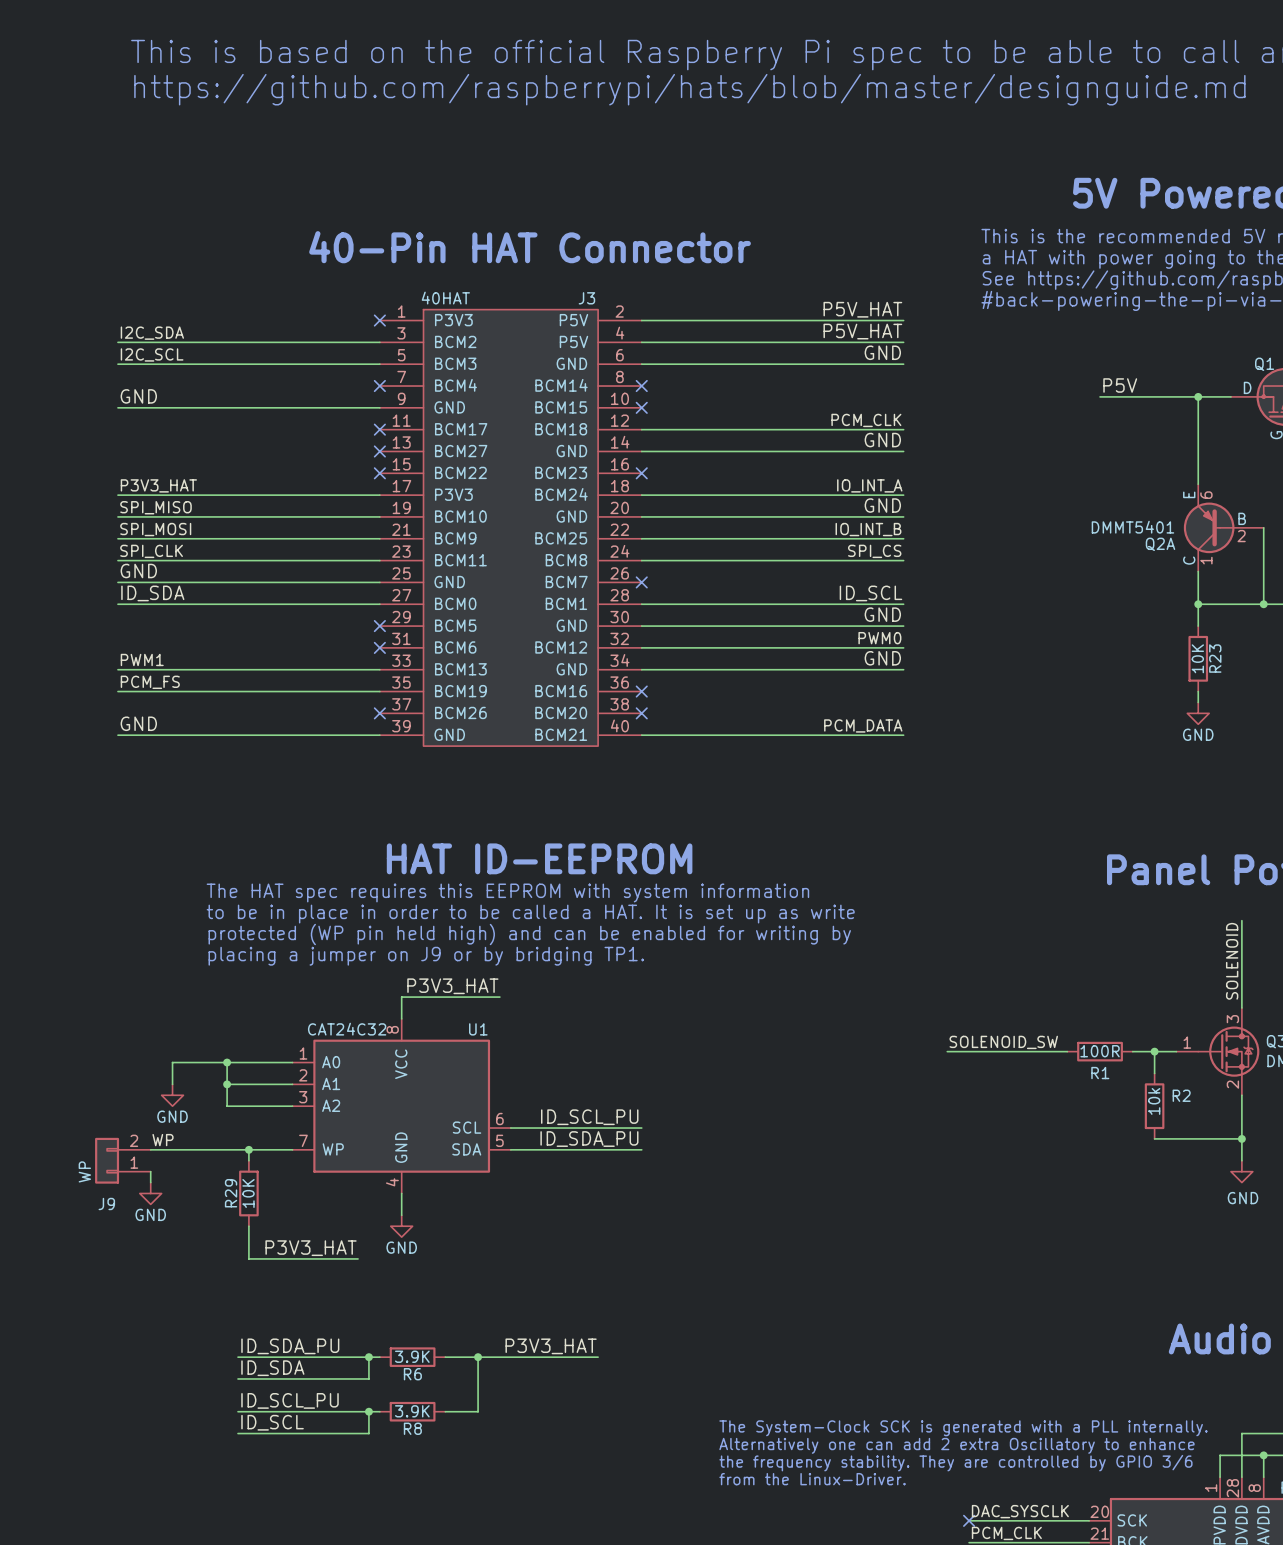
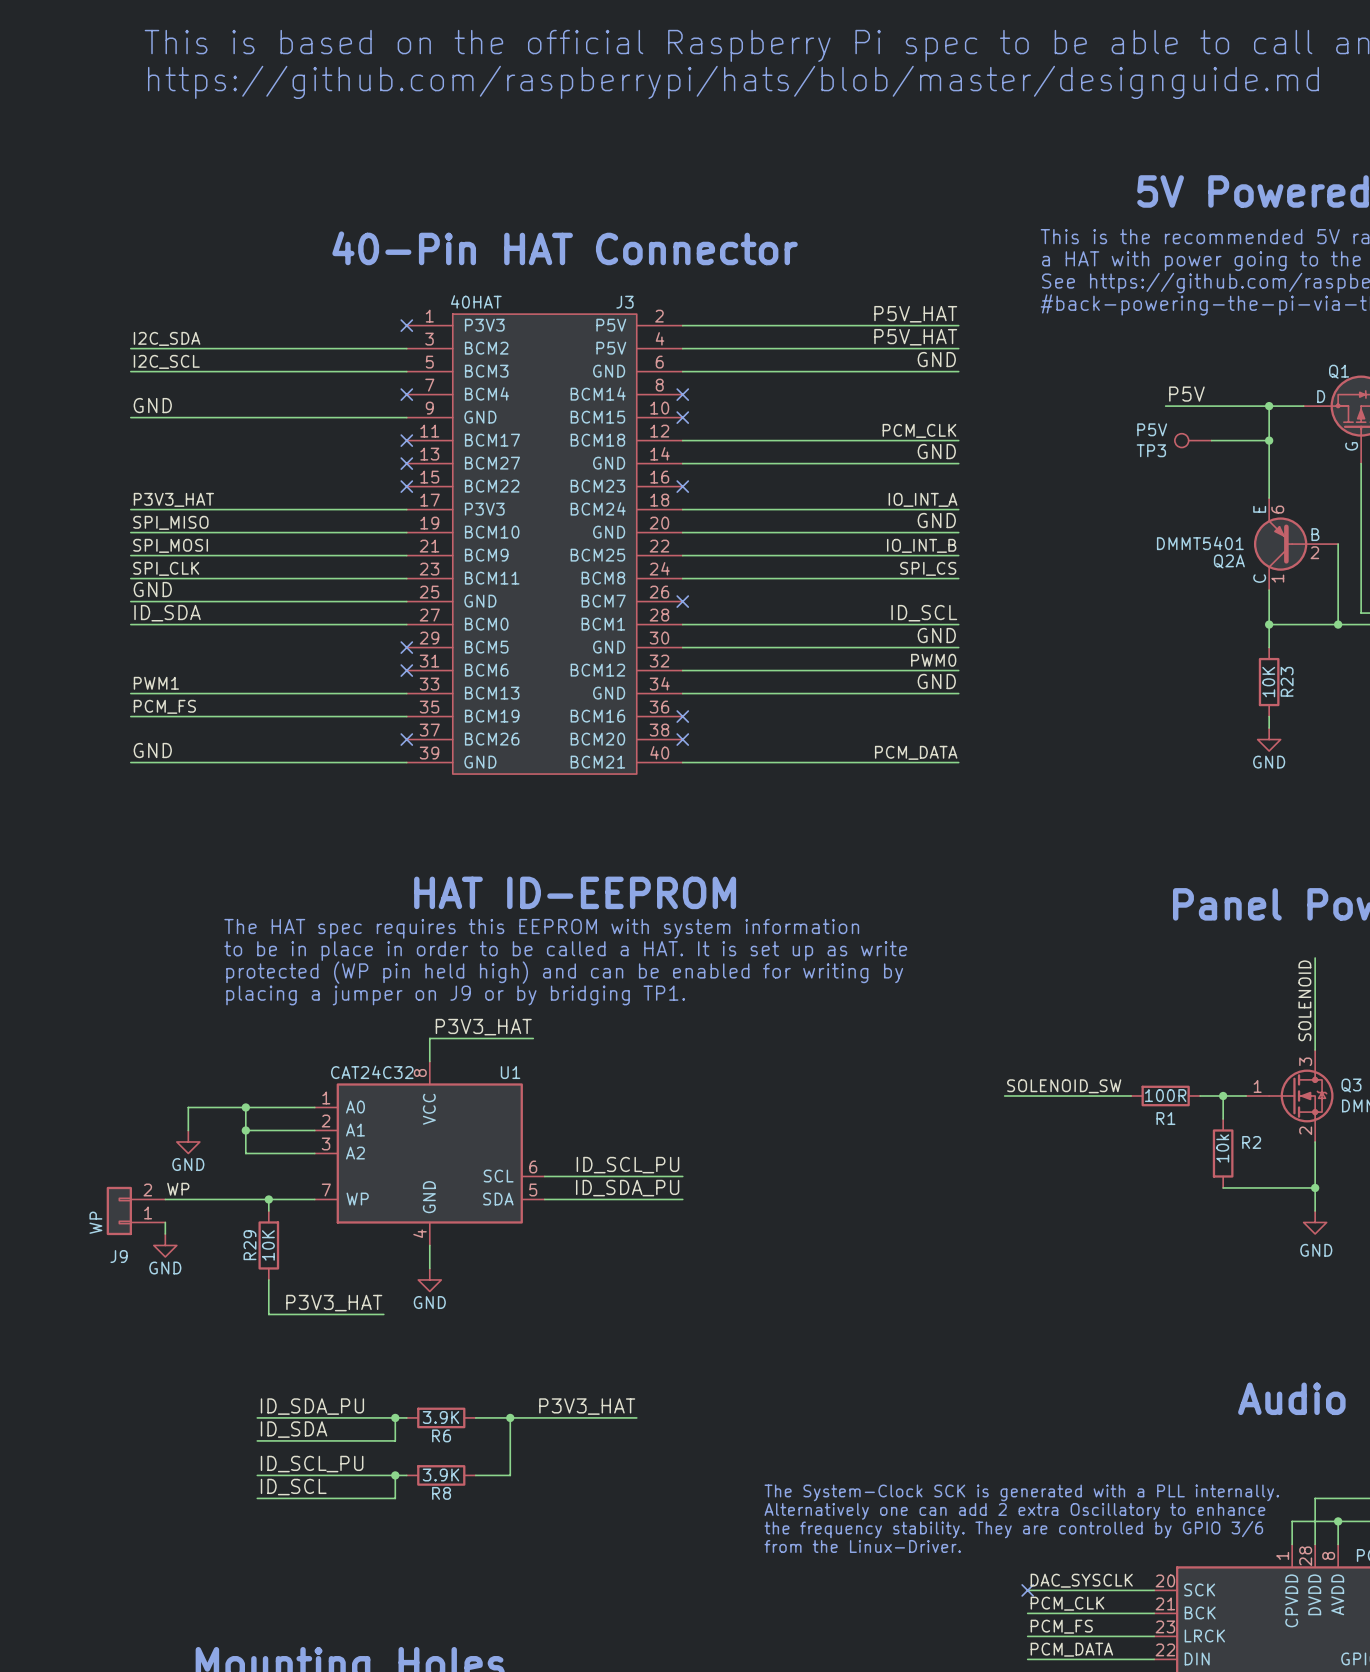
TP3: none -> P5V (1193, 440)
wire: none -> (1211, 440) (1269, 440)
junction: none -> (1269, 440)

